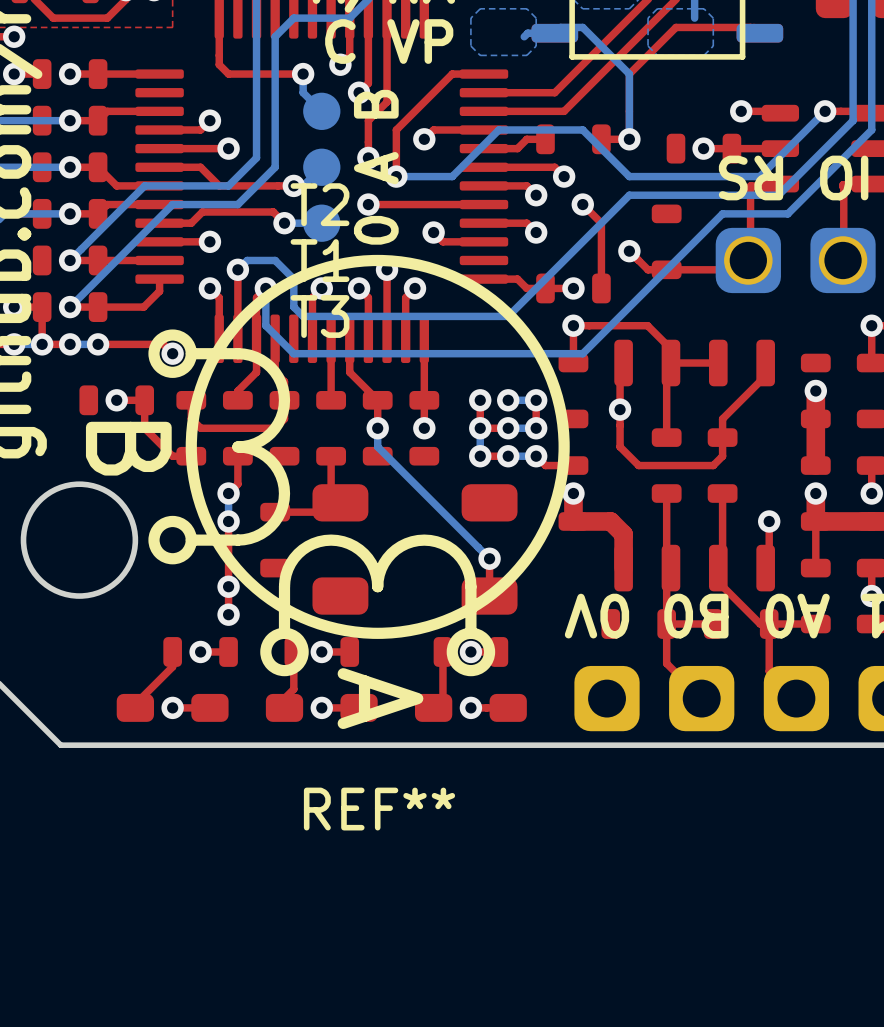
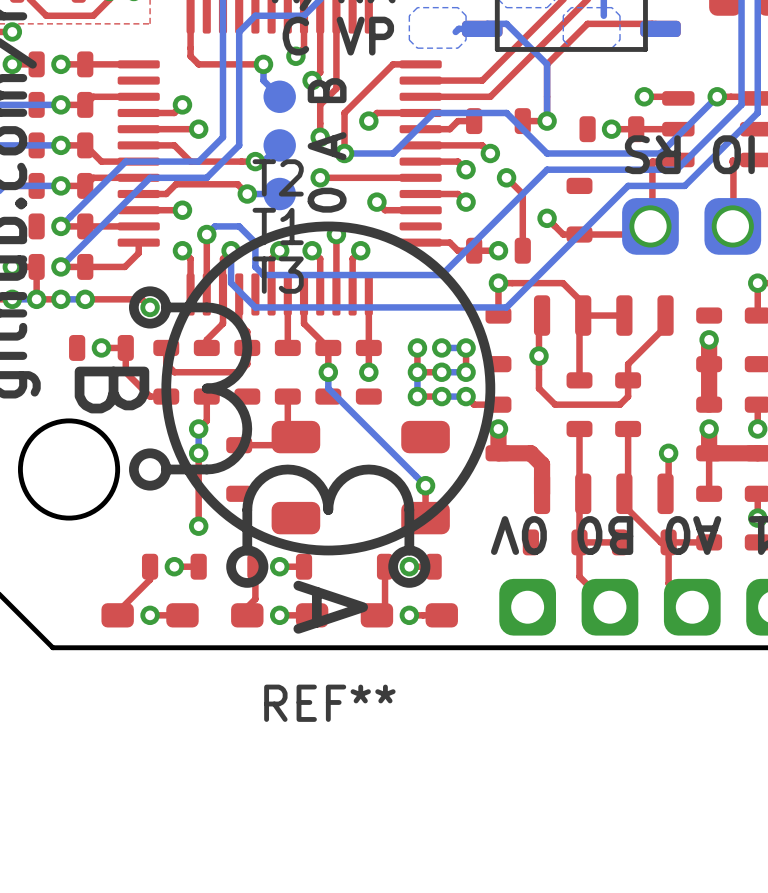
via: (228, 586) -> none
via: none -> (198, 526)
via: (228, 614) -> none

